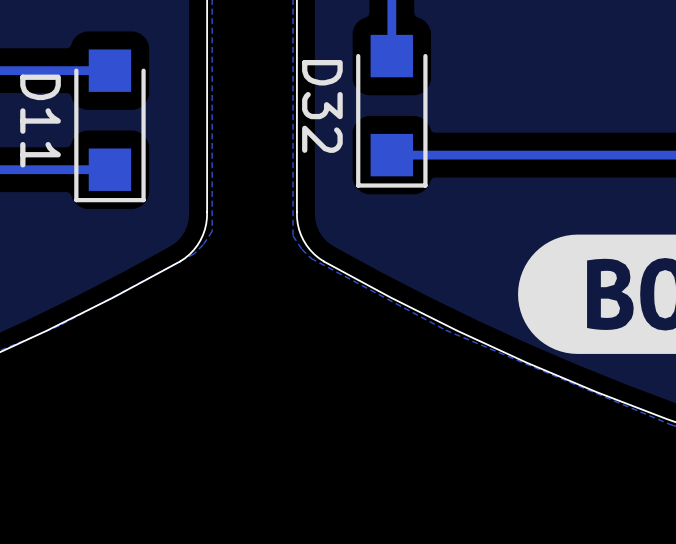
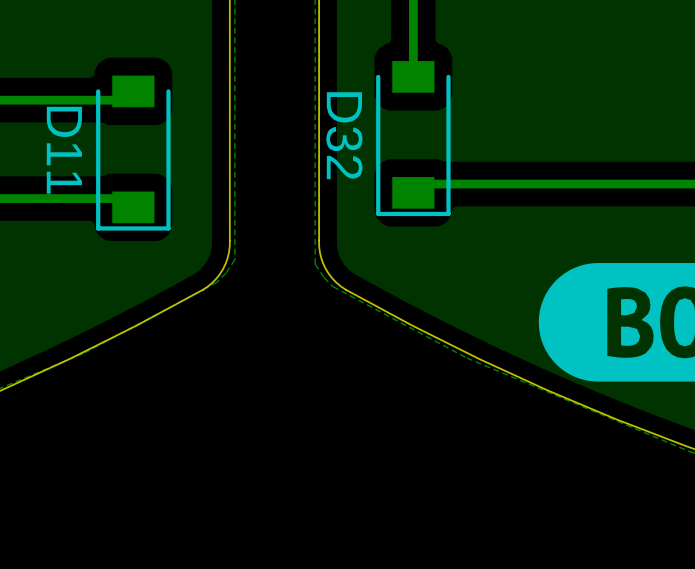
D32 footprint: [356, 34, 428, 188] -> [376, 61, 451, 217]
D11 footprint: [74, 49, 146, 203] -> [96, 75, 171, 231]

